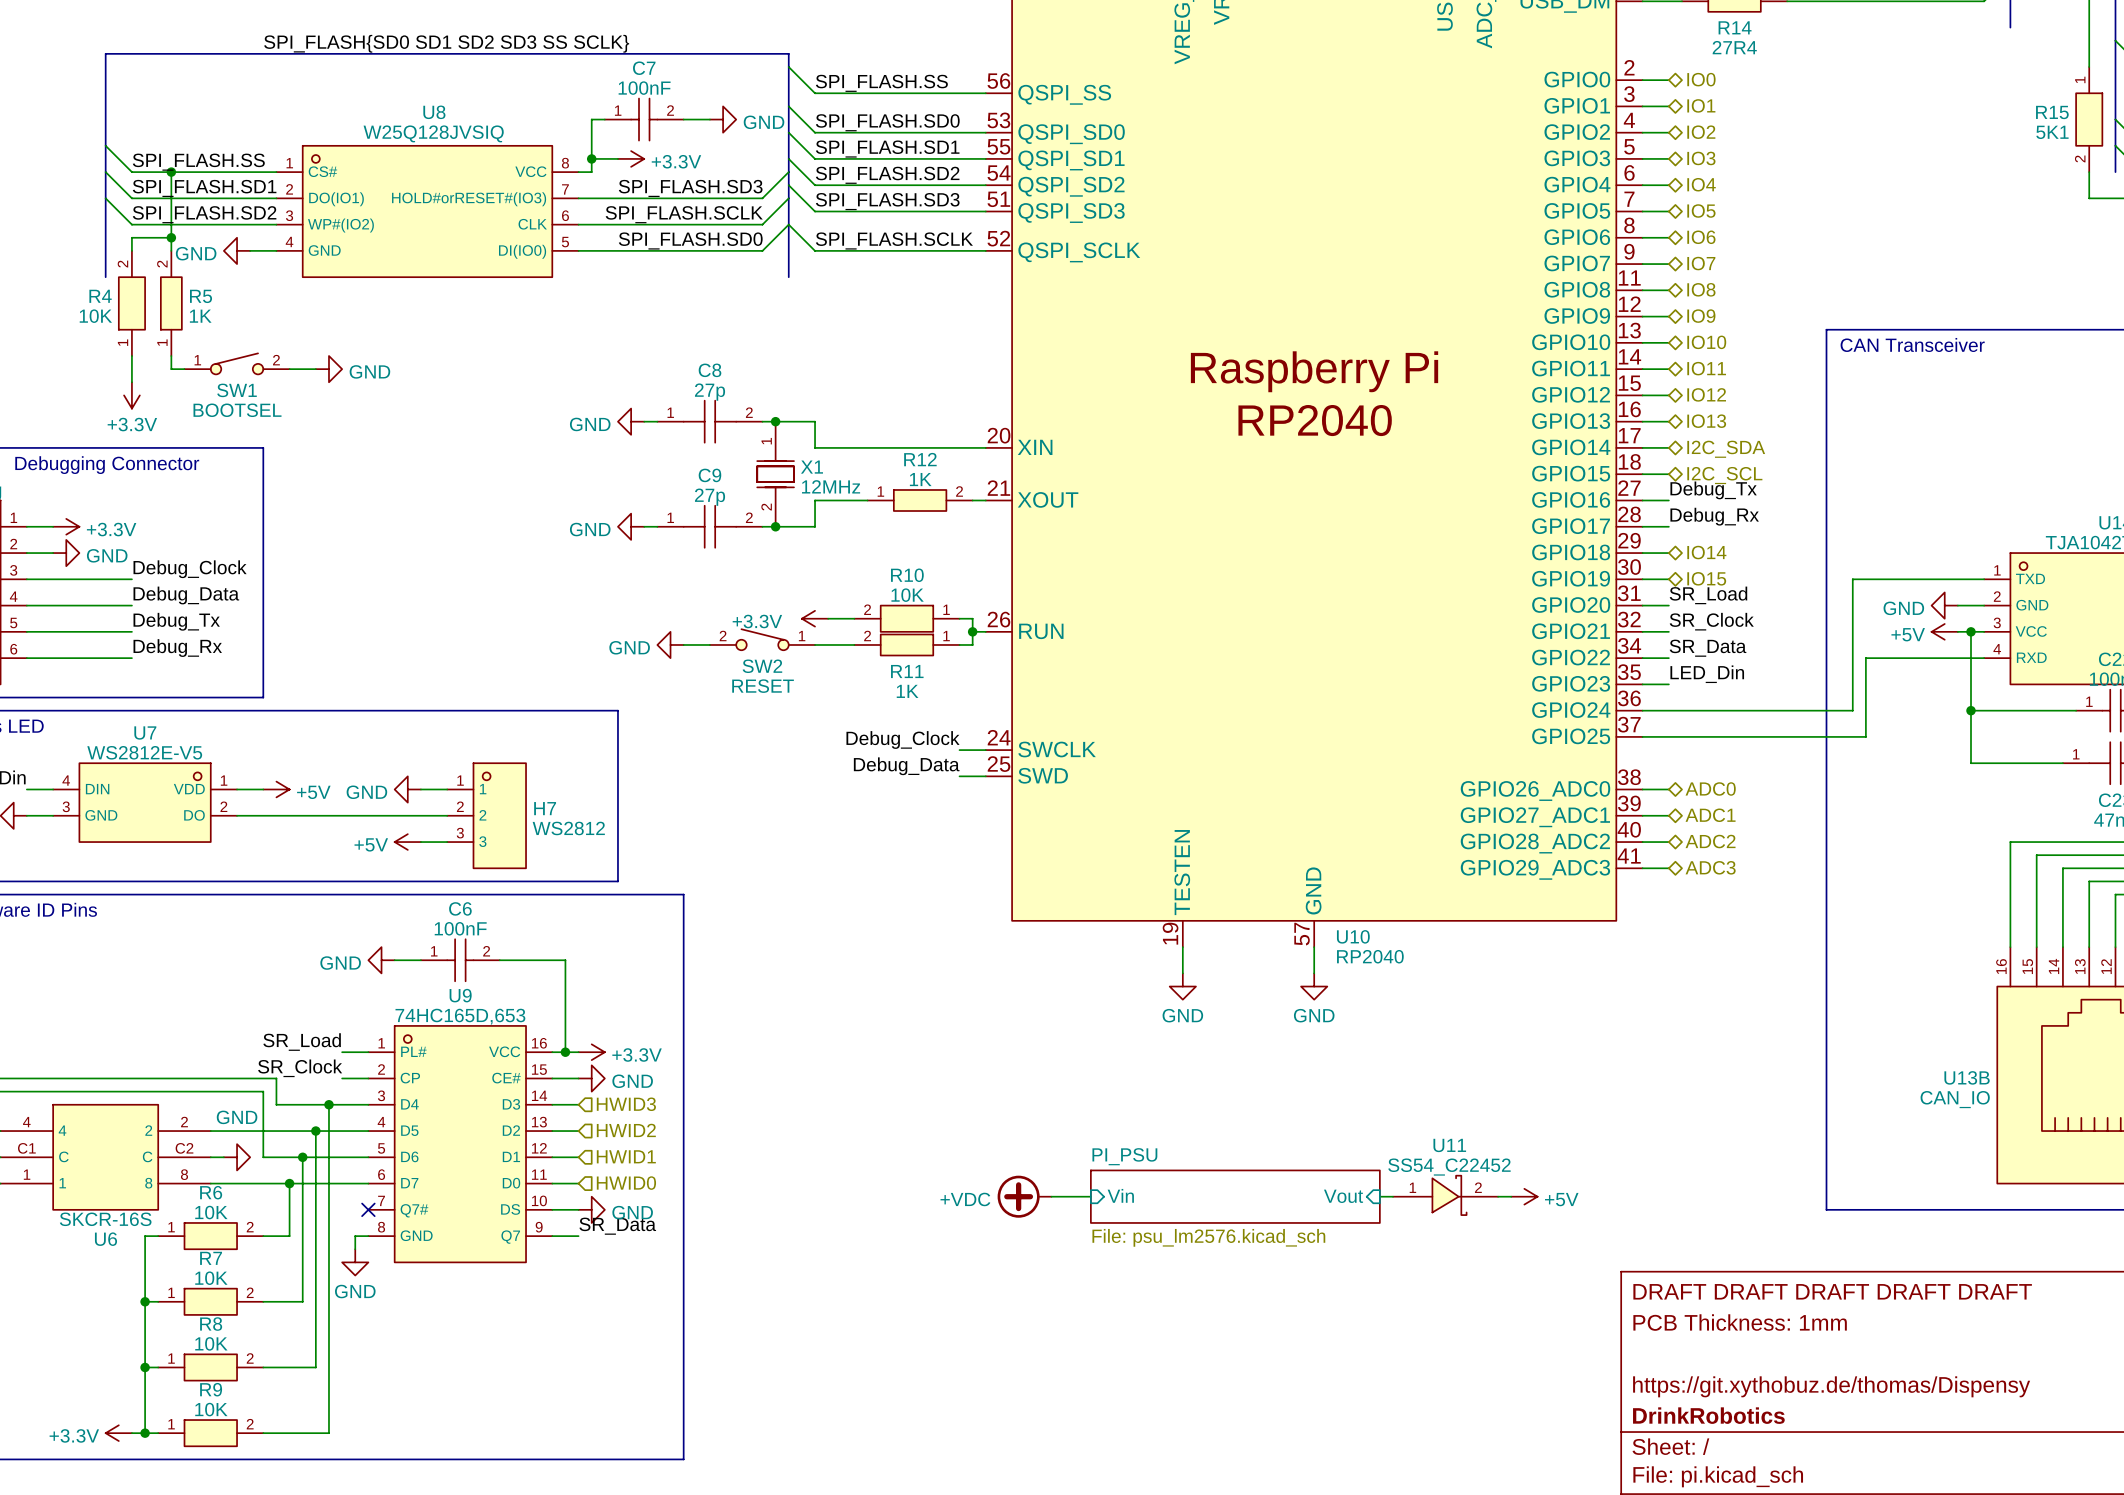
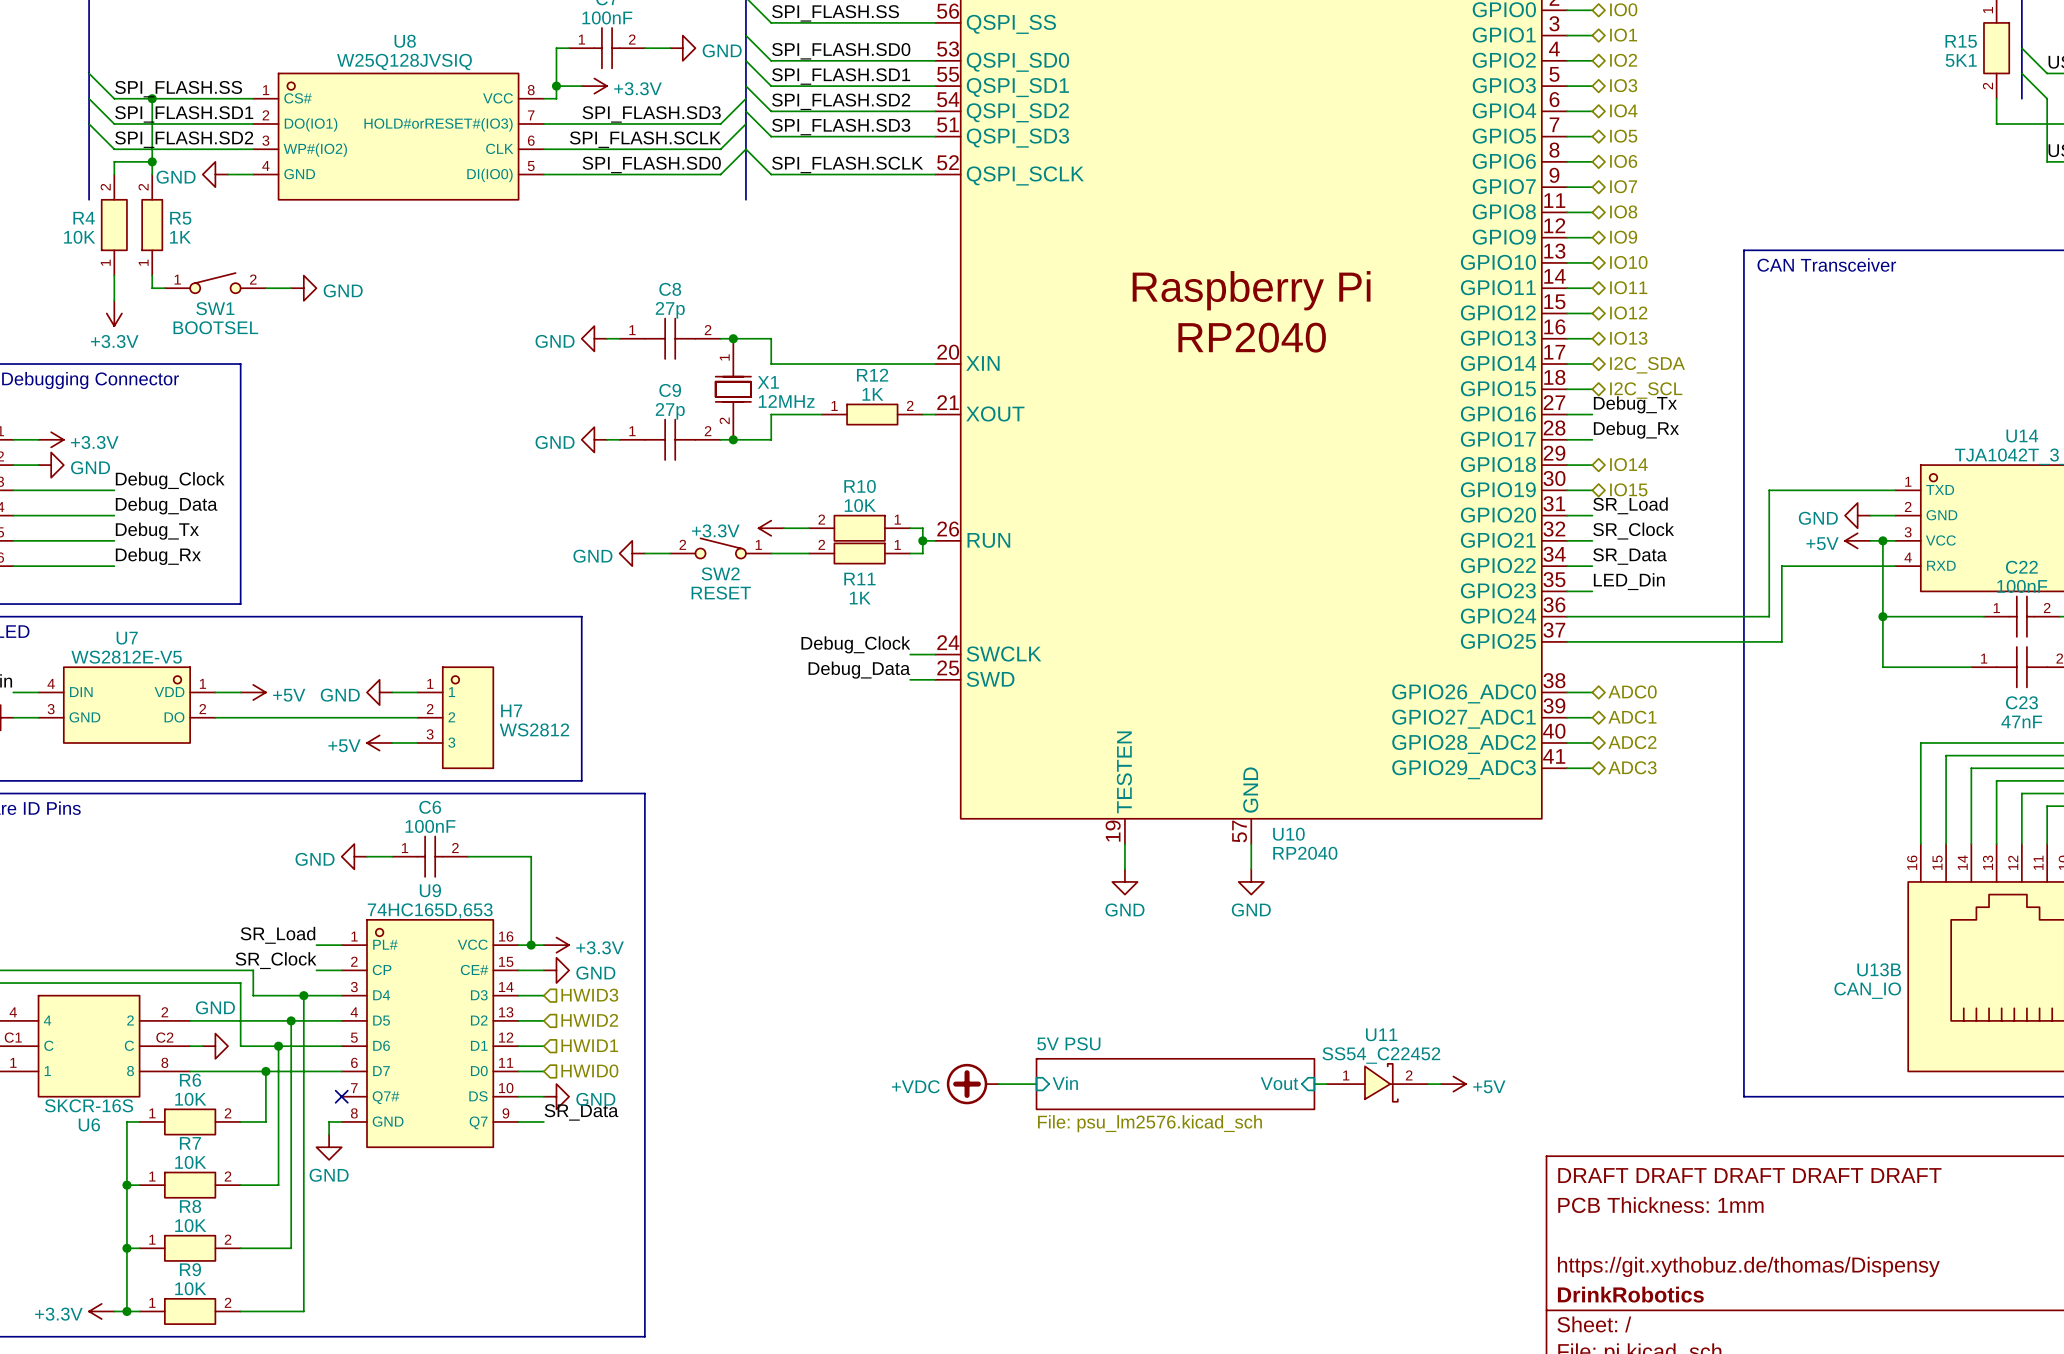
sheet PI_PSU name: PI_PSU (1124, 1156) -> 5V PSU (1068, 1043)

